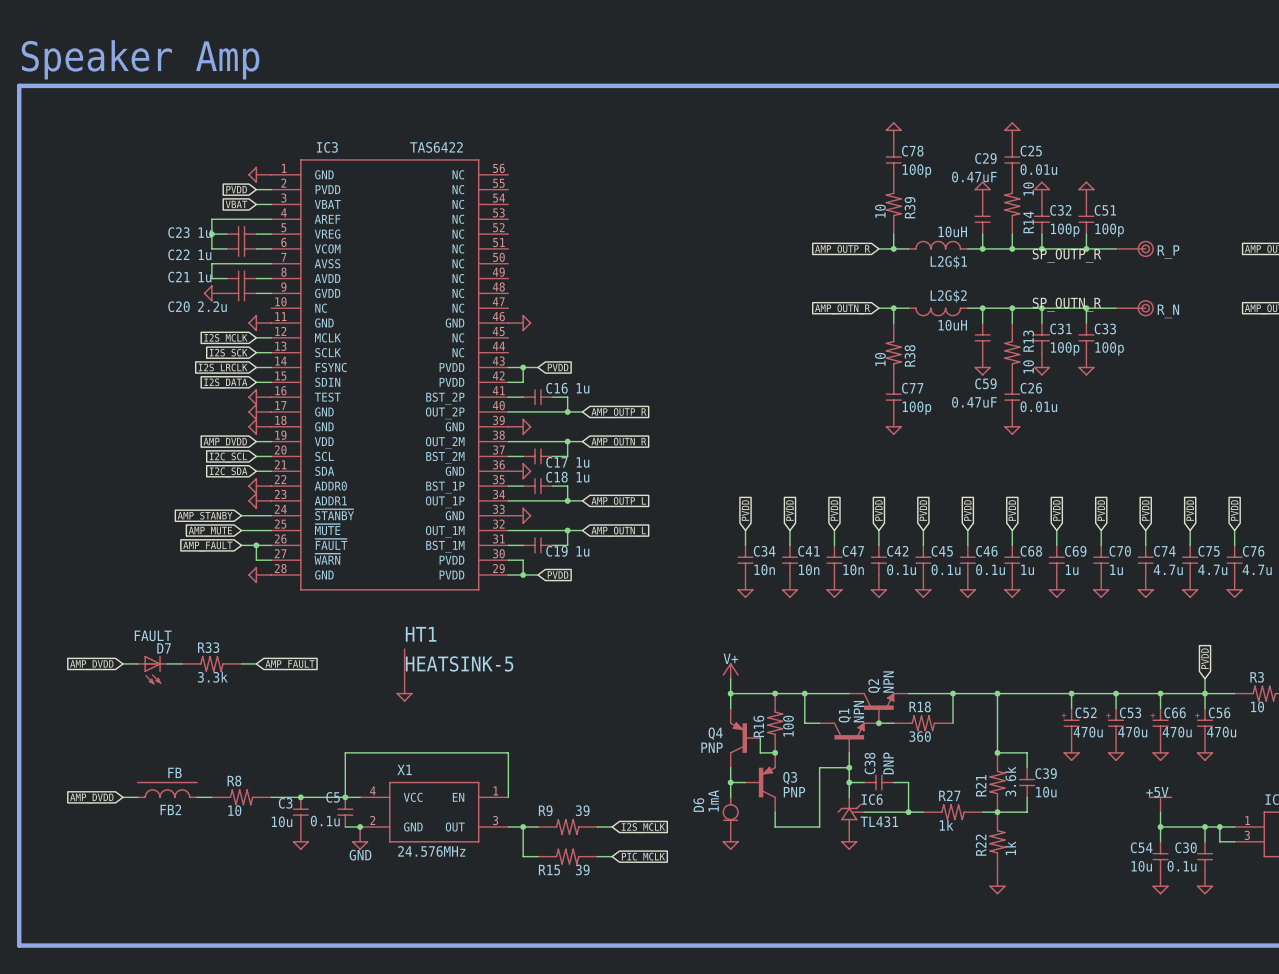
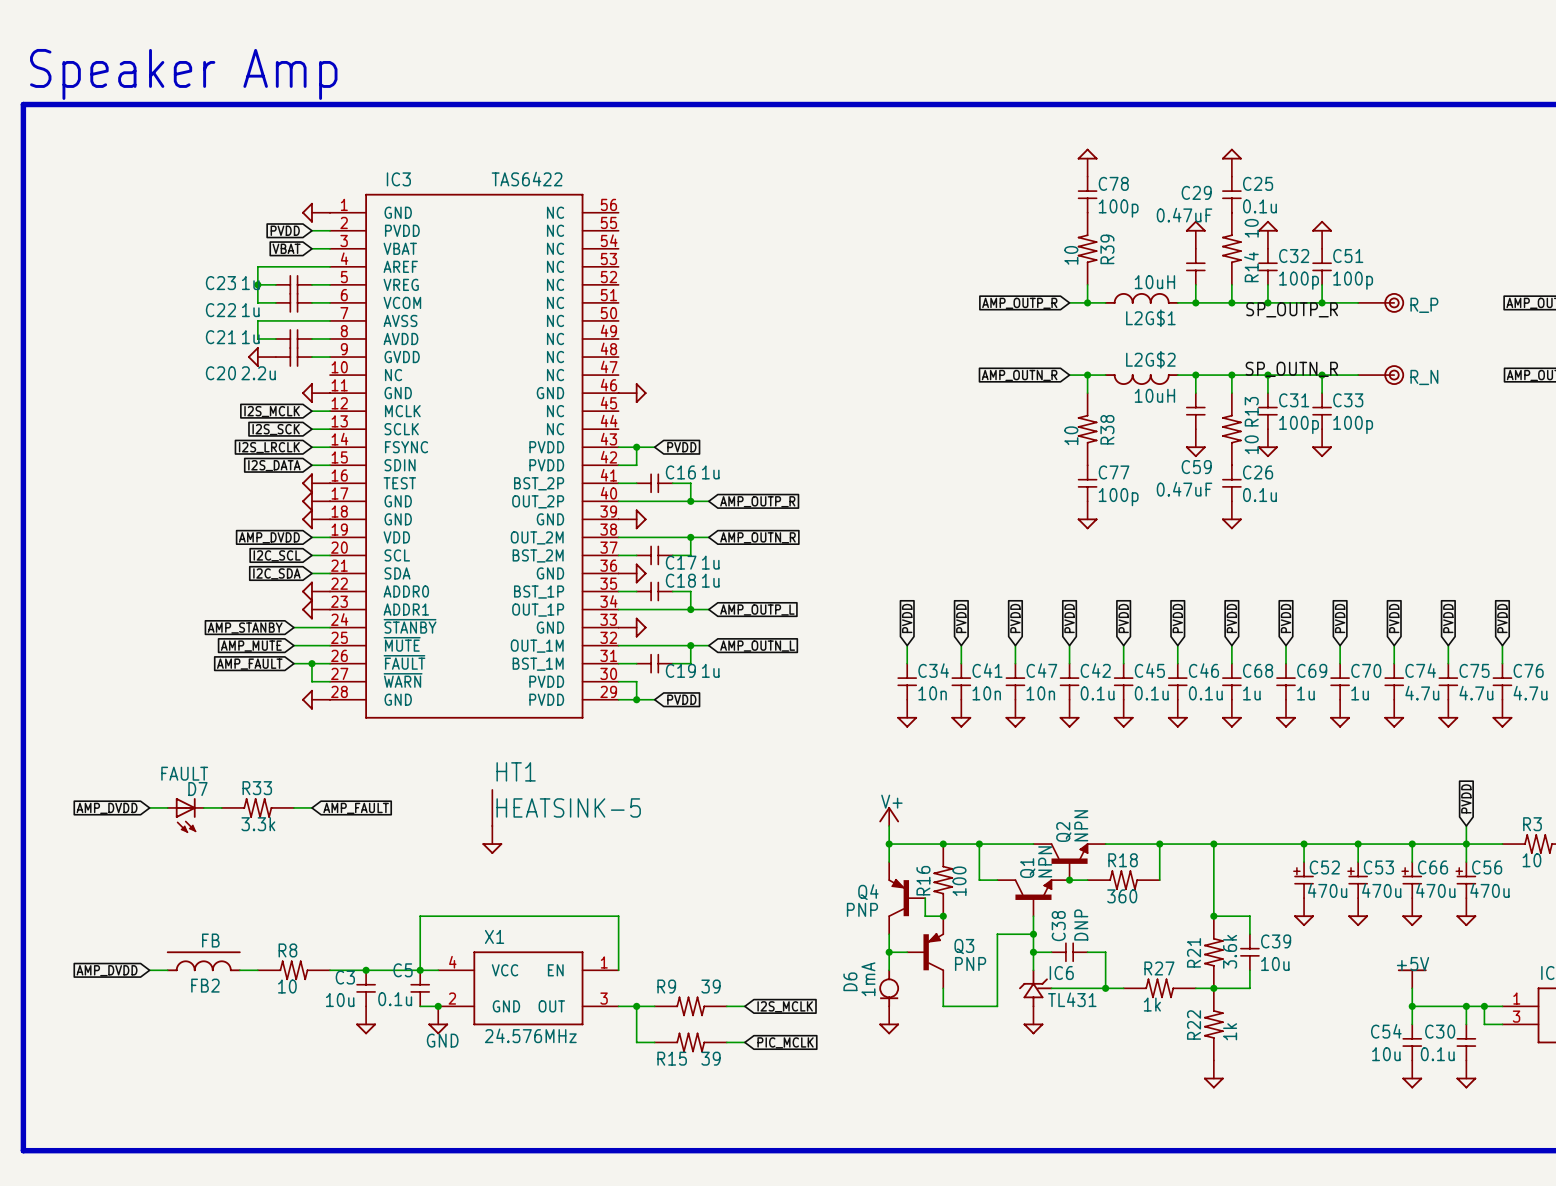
C25 value: 0.01u (1038, 169) -> 0.1u (1259, 206)
C26 value: 0.01u (1038, 406) -> 0.1u (1259, 495)

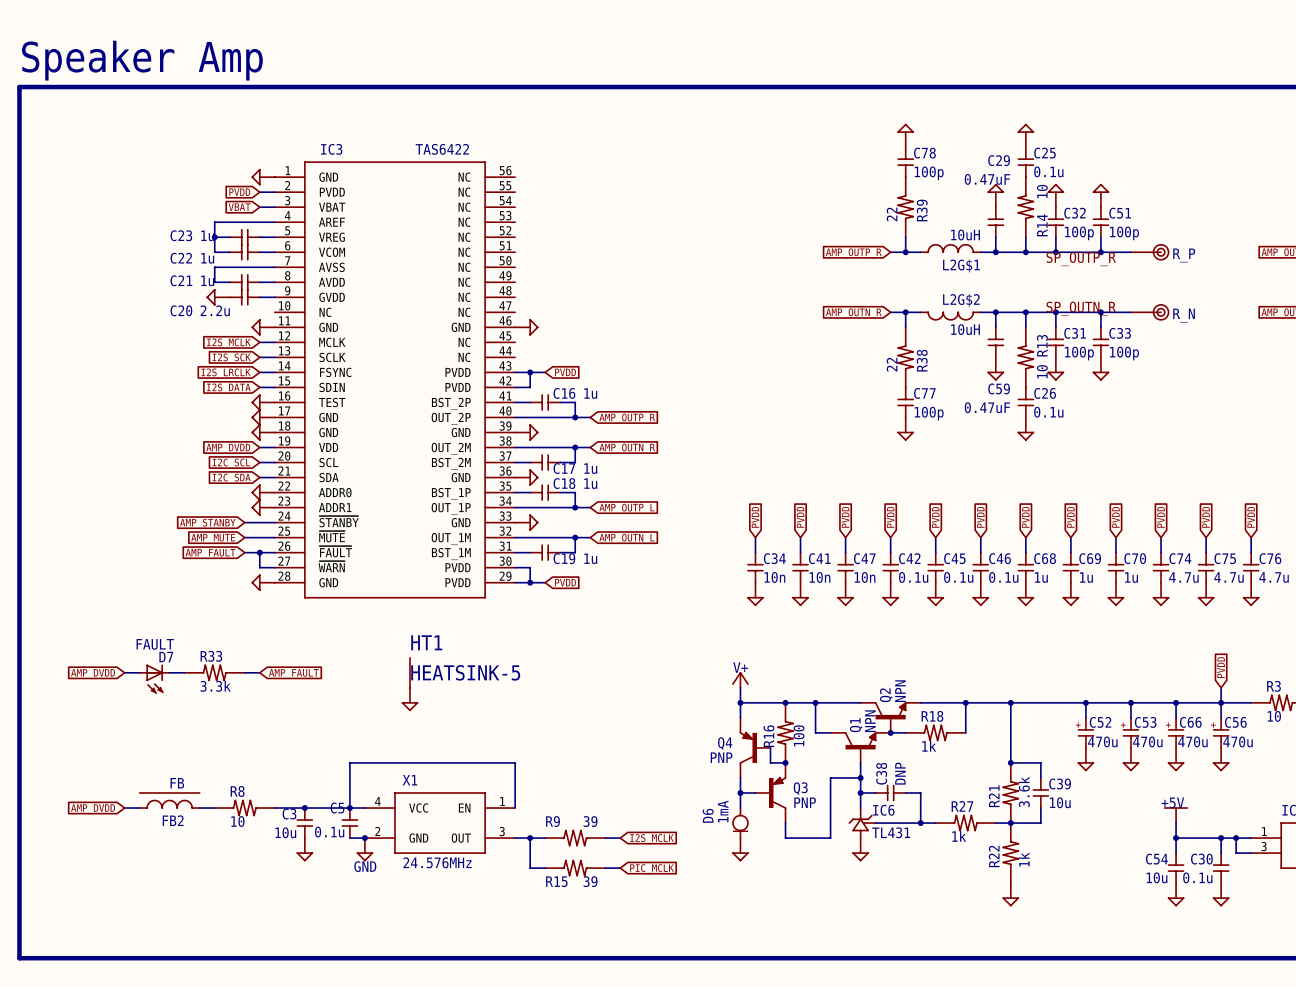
R39 value: 10 (1071, 255) -> 22 (892, 214)
R38 value: 10 (1071, 435) -> 22 (892, 364)
R18 value: 360 (1122, 896) -> 1k (929, 746)

